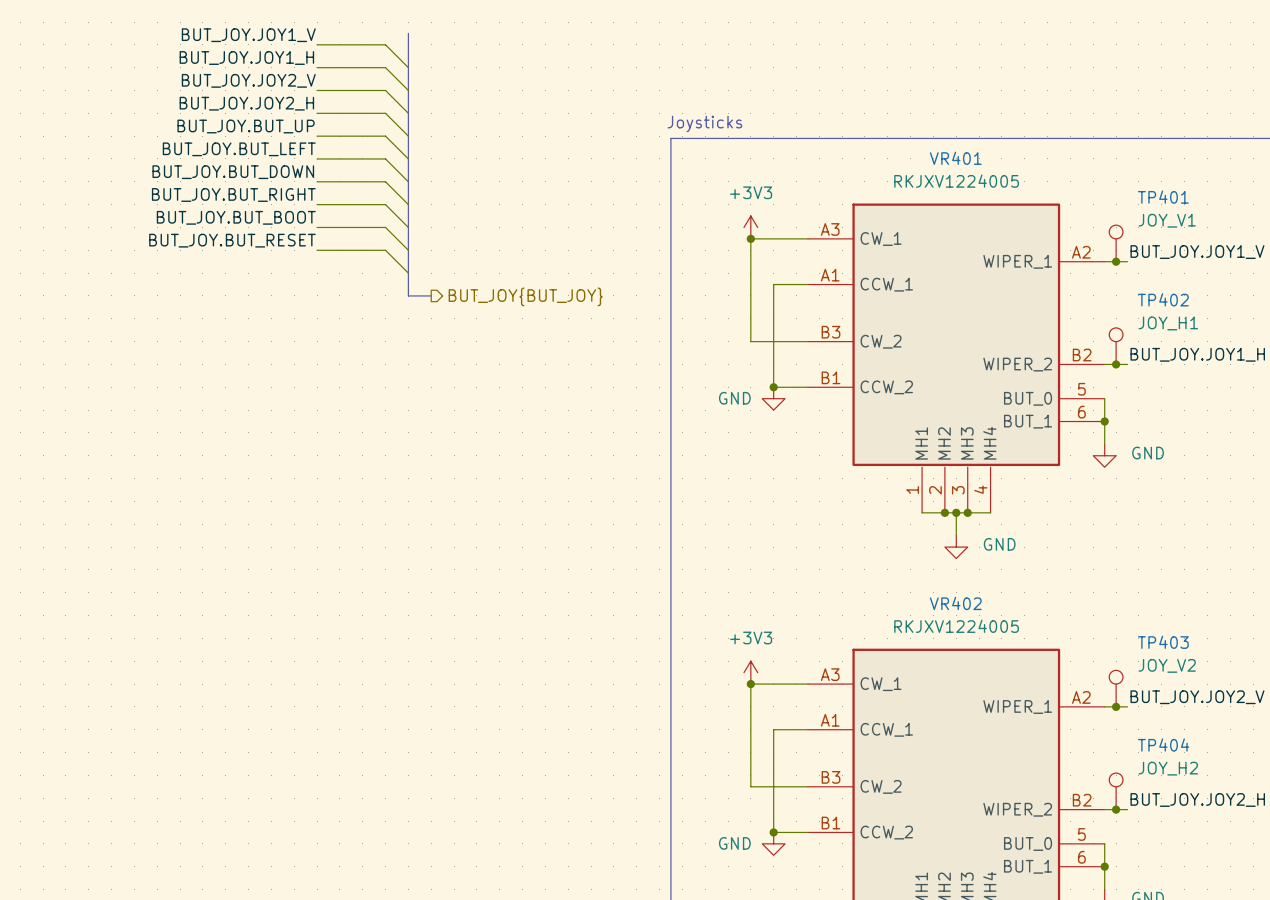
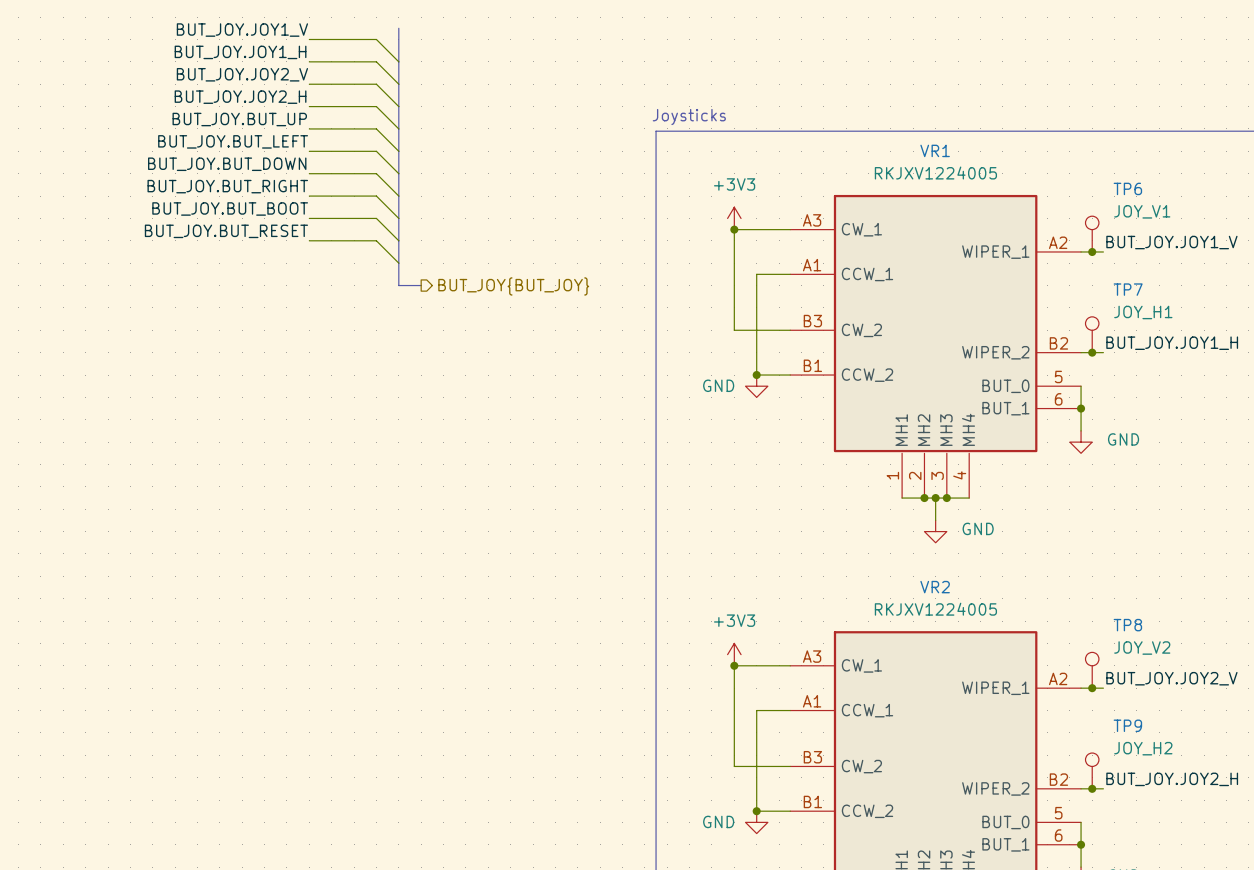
VR401 name: VR401 (955, 158) -> VR1 (935, 150)
TP401 name: TP401 (1163, 197) -> TP6 (1127, 188)
TP402 name: TP402 (1163, 299) -> TP7 (1128, 289)
VR402 name: VR402 (955, 603) -> VR2 (935, 587)
TP403 name: TP403 (1163, 642) -> TP8 (1127, 625)
TP404 name: TP404 (1163, 745) -> TP9 (1127, 725)

